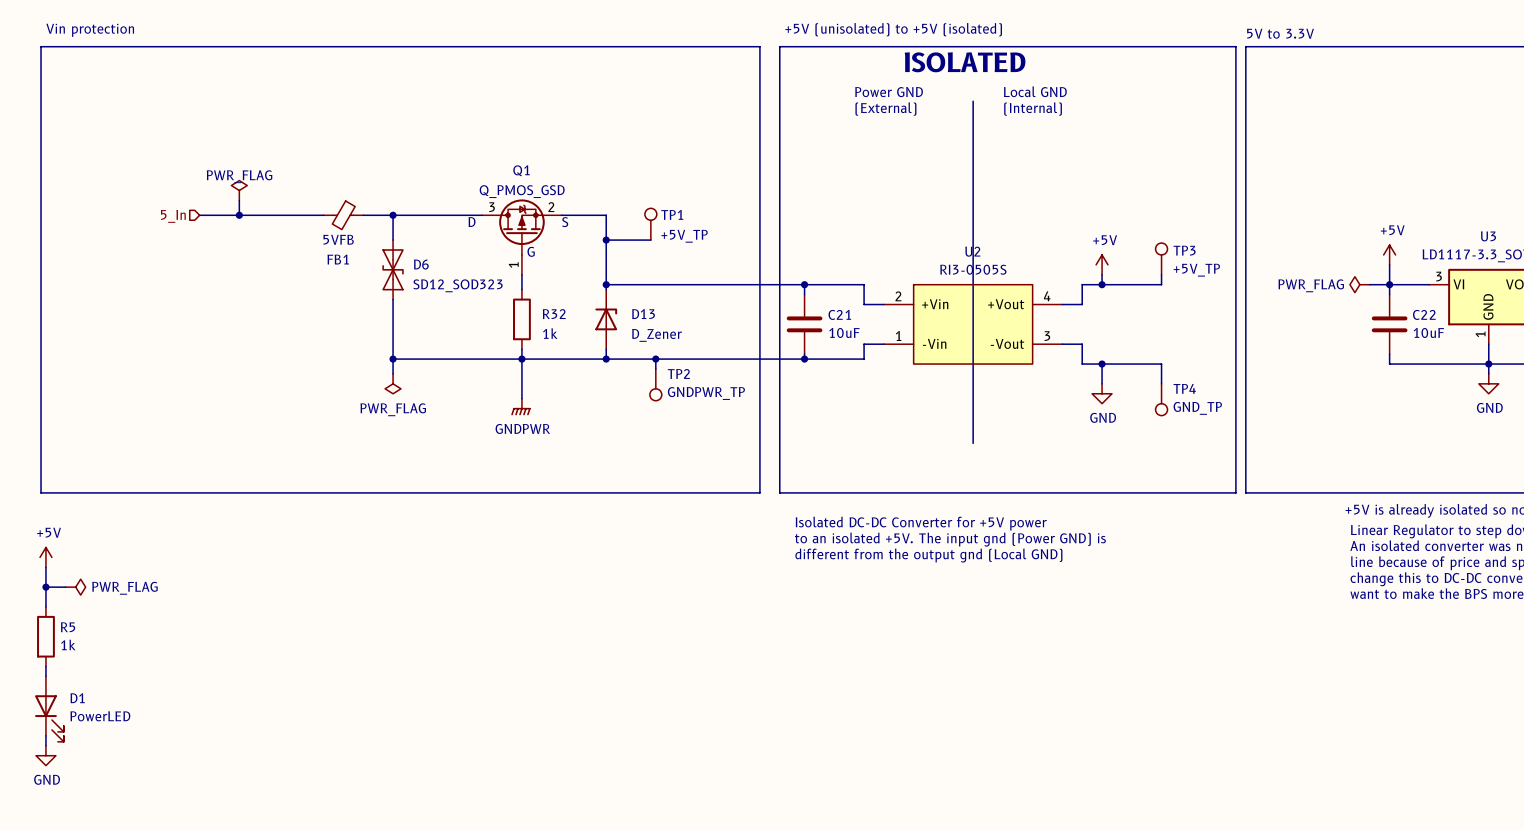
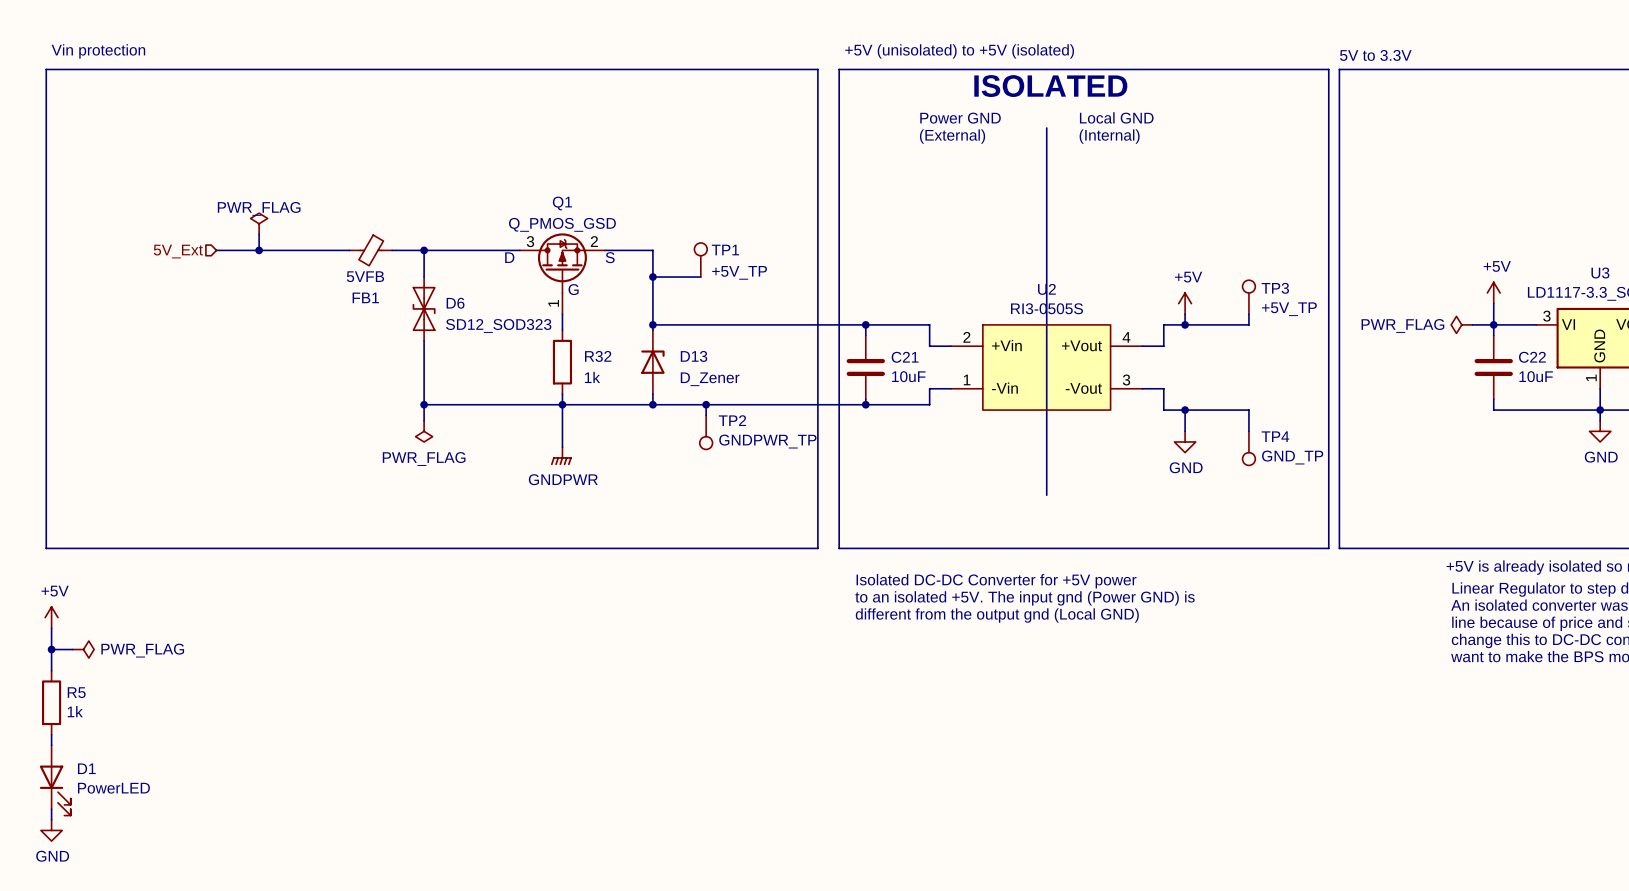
hierarchical label: 5_In (173, 216) -> 5V_Ext (178, 251)

